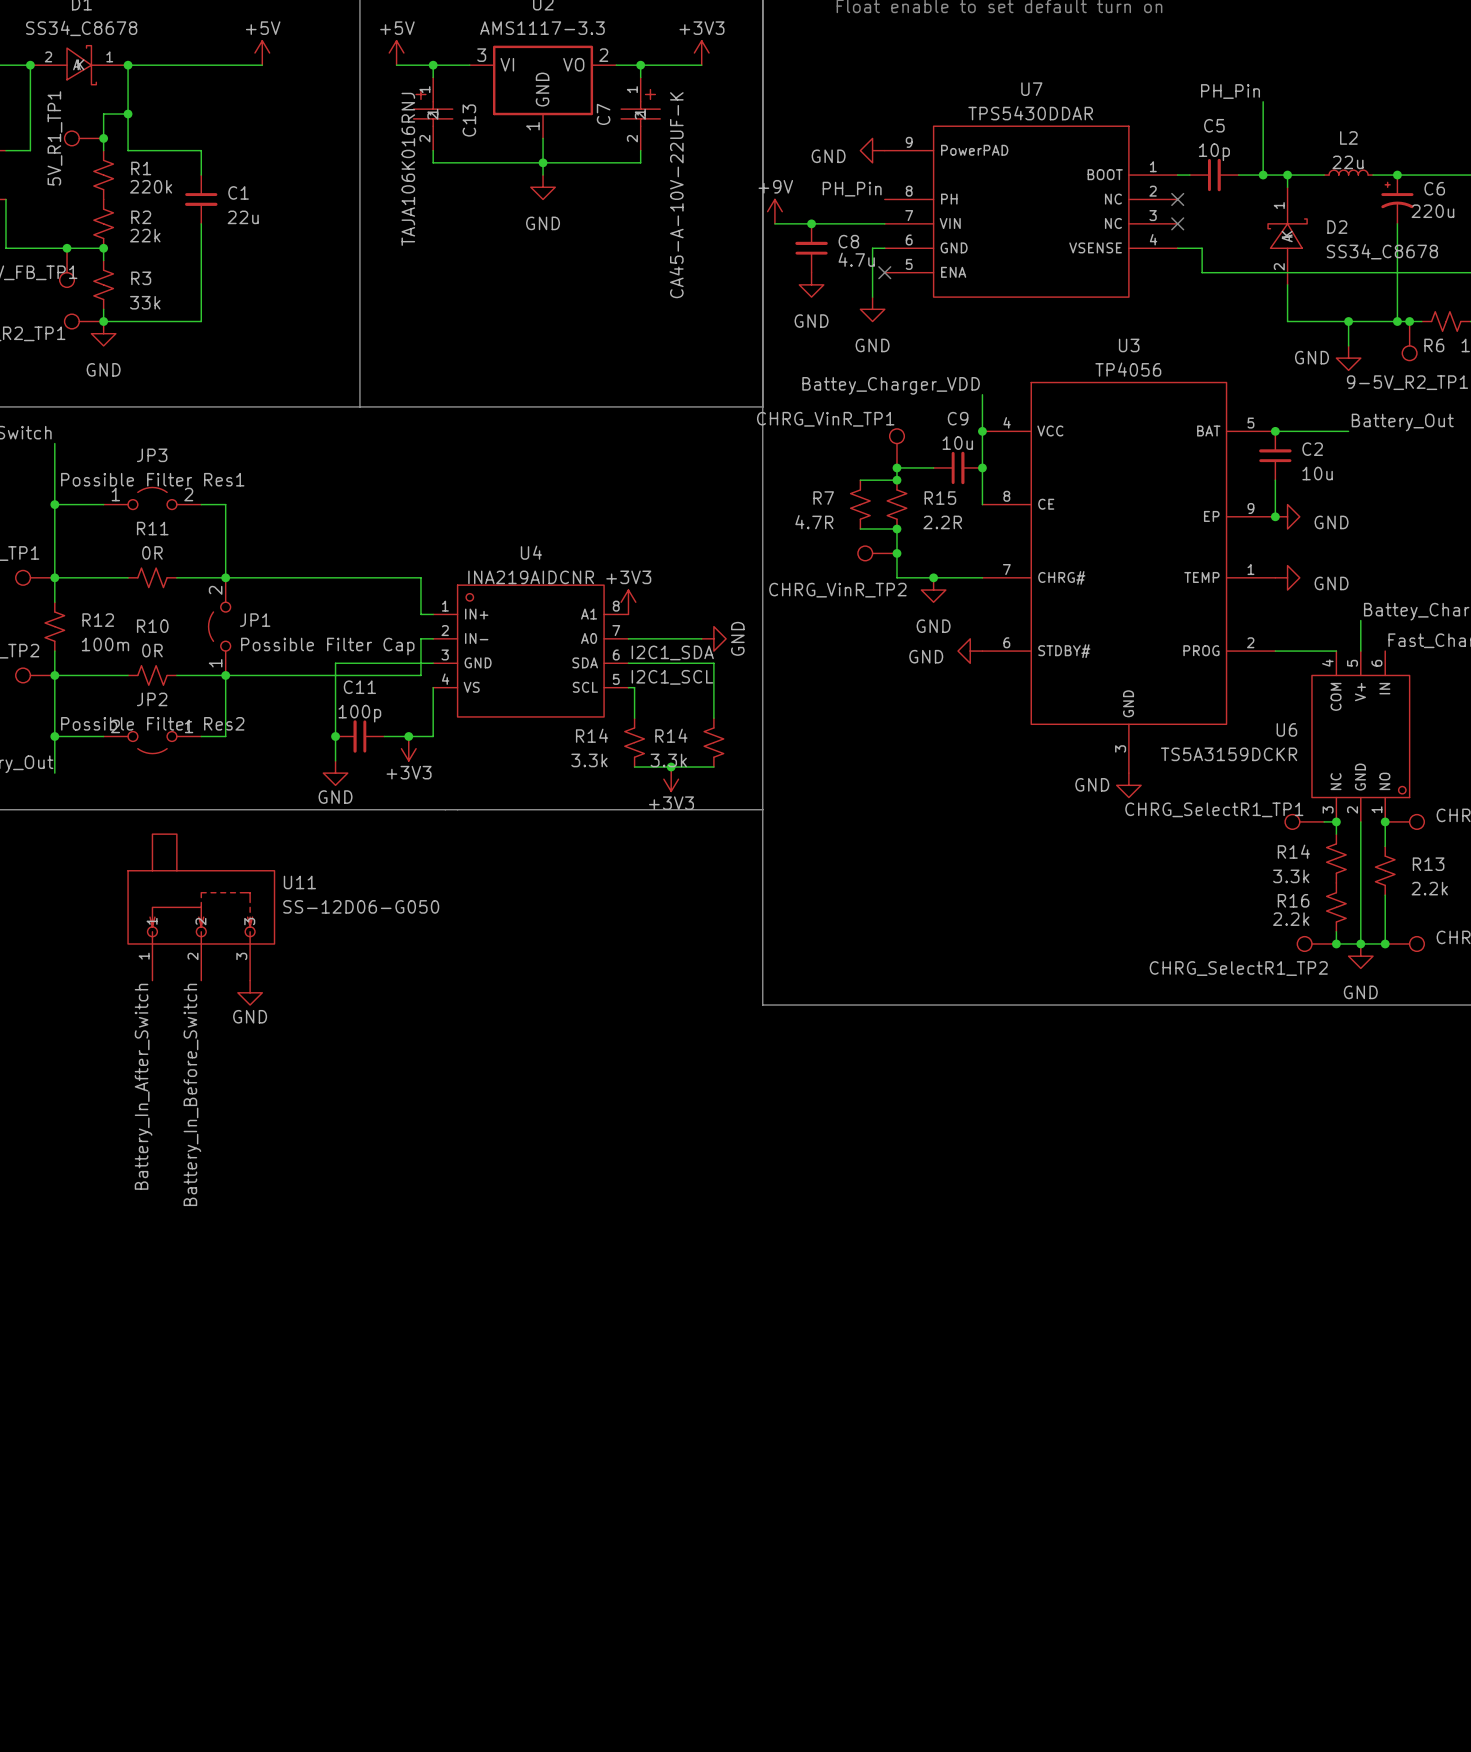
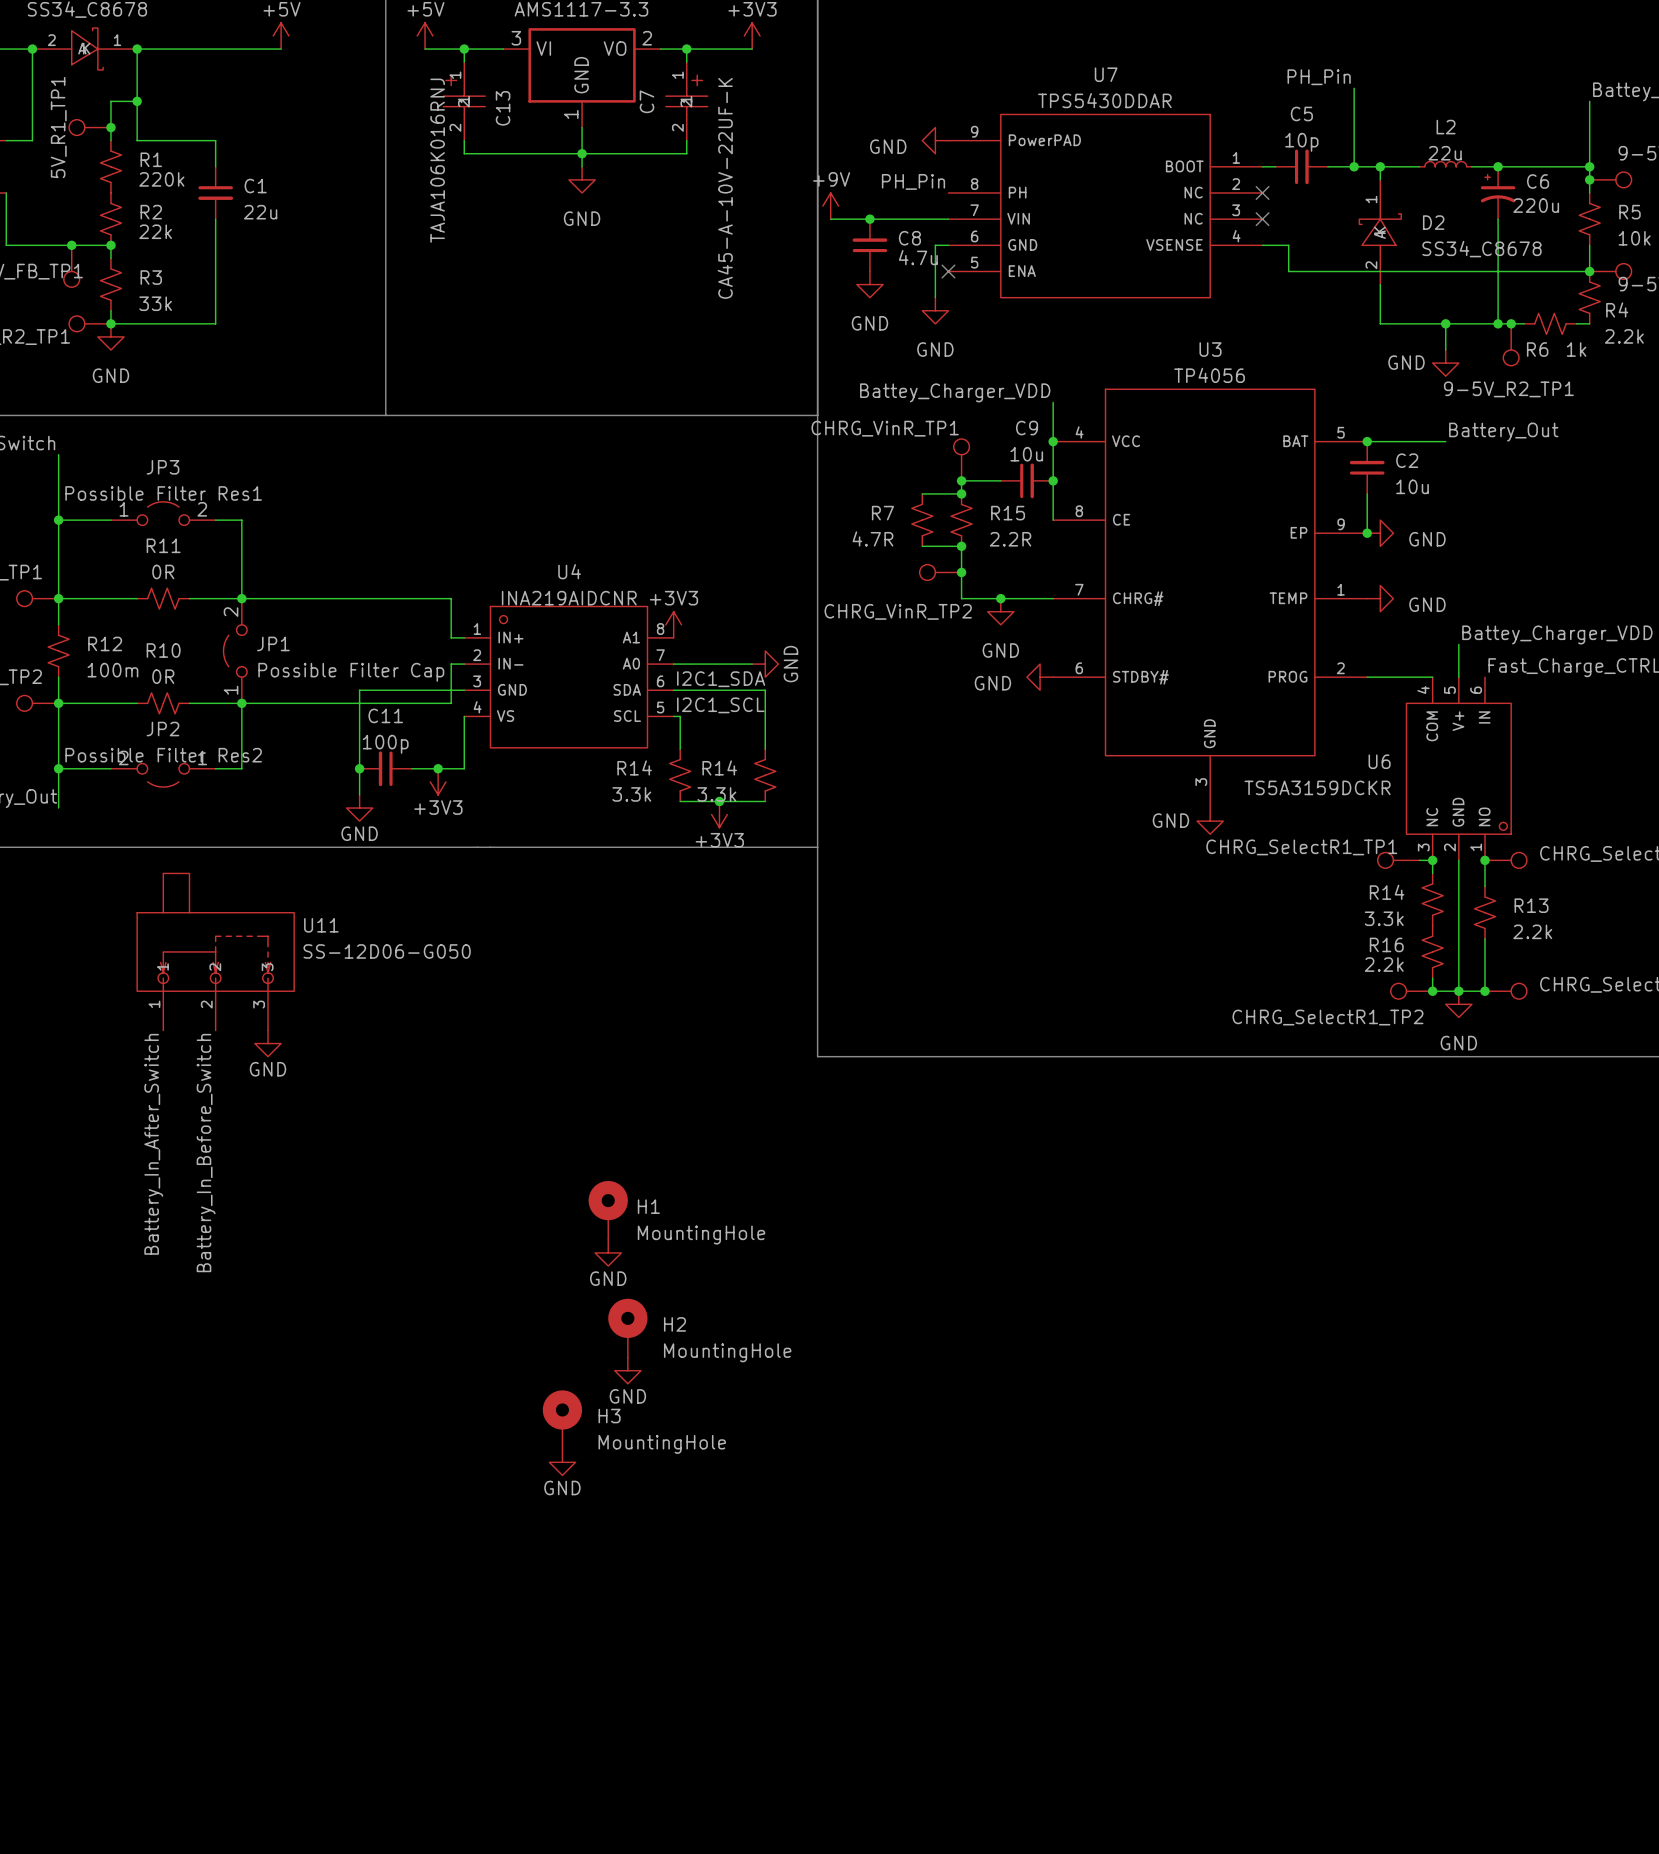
H1: none -> MountingHole (608, 1210)
power symbol: none -> GND (608, 1252)
H2: none -> MountingHole (627, 1328)
power symbol: none -> GND (627, 1370)
H3: none -> MountingHole (562, 1419)
power symbol: none -> GND (562, 1462)

